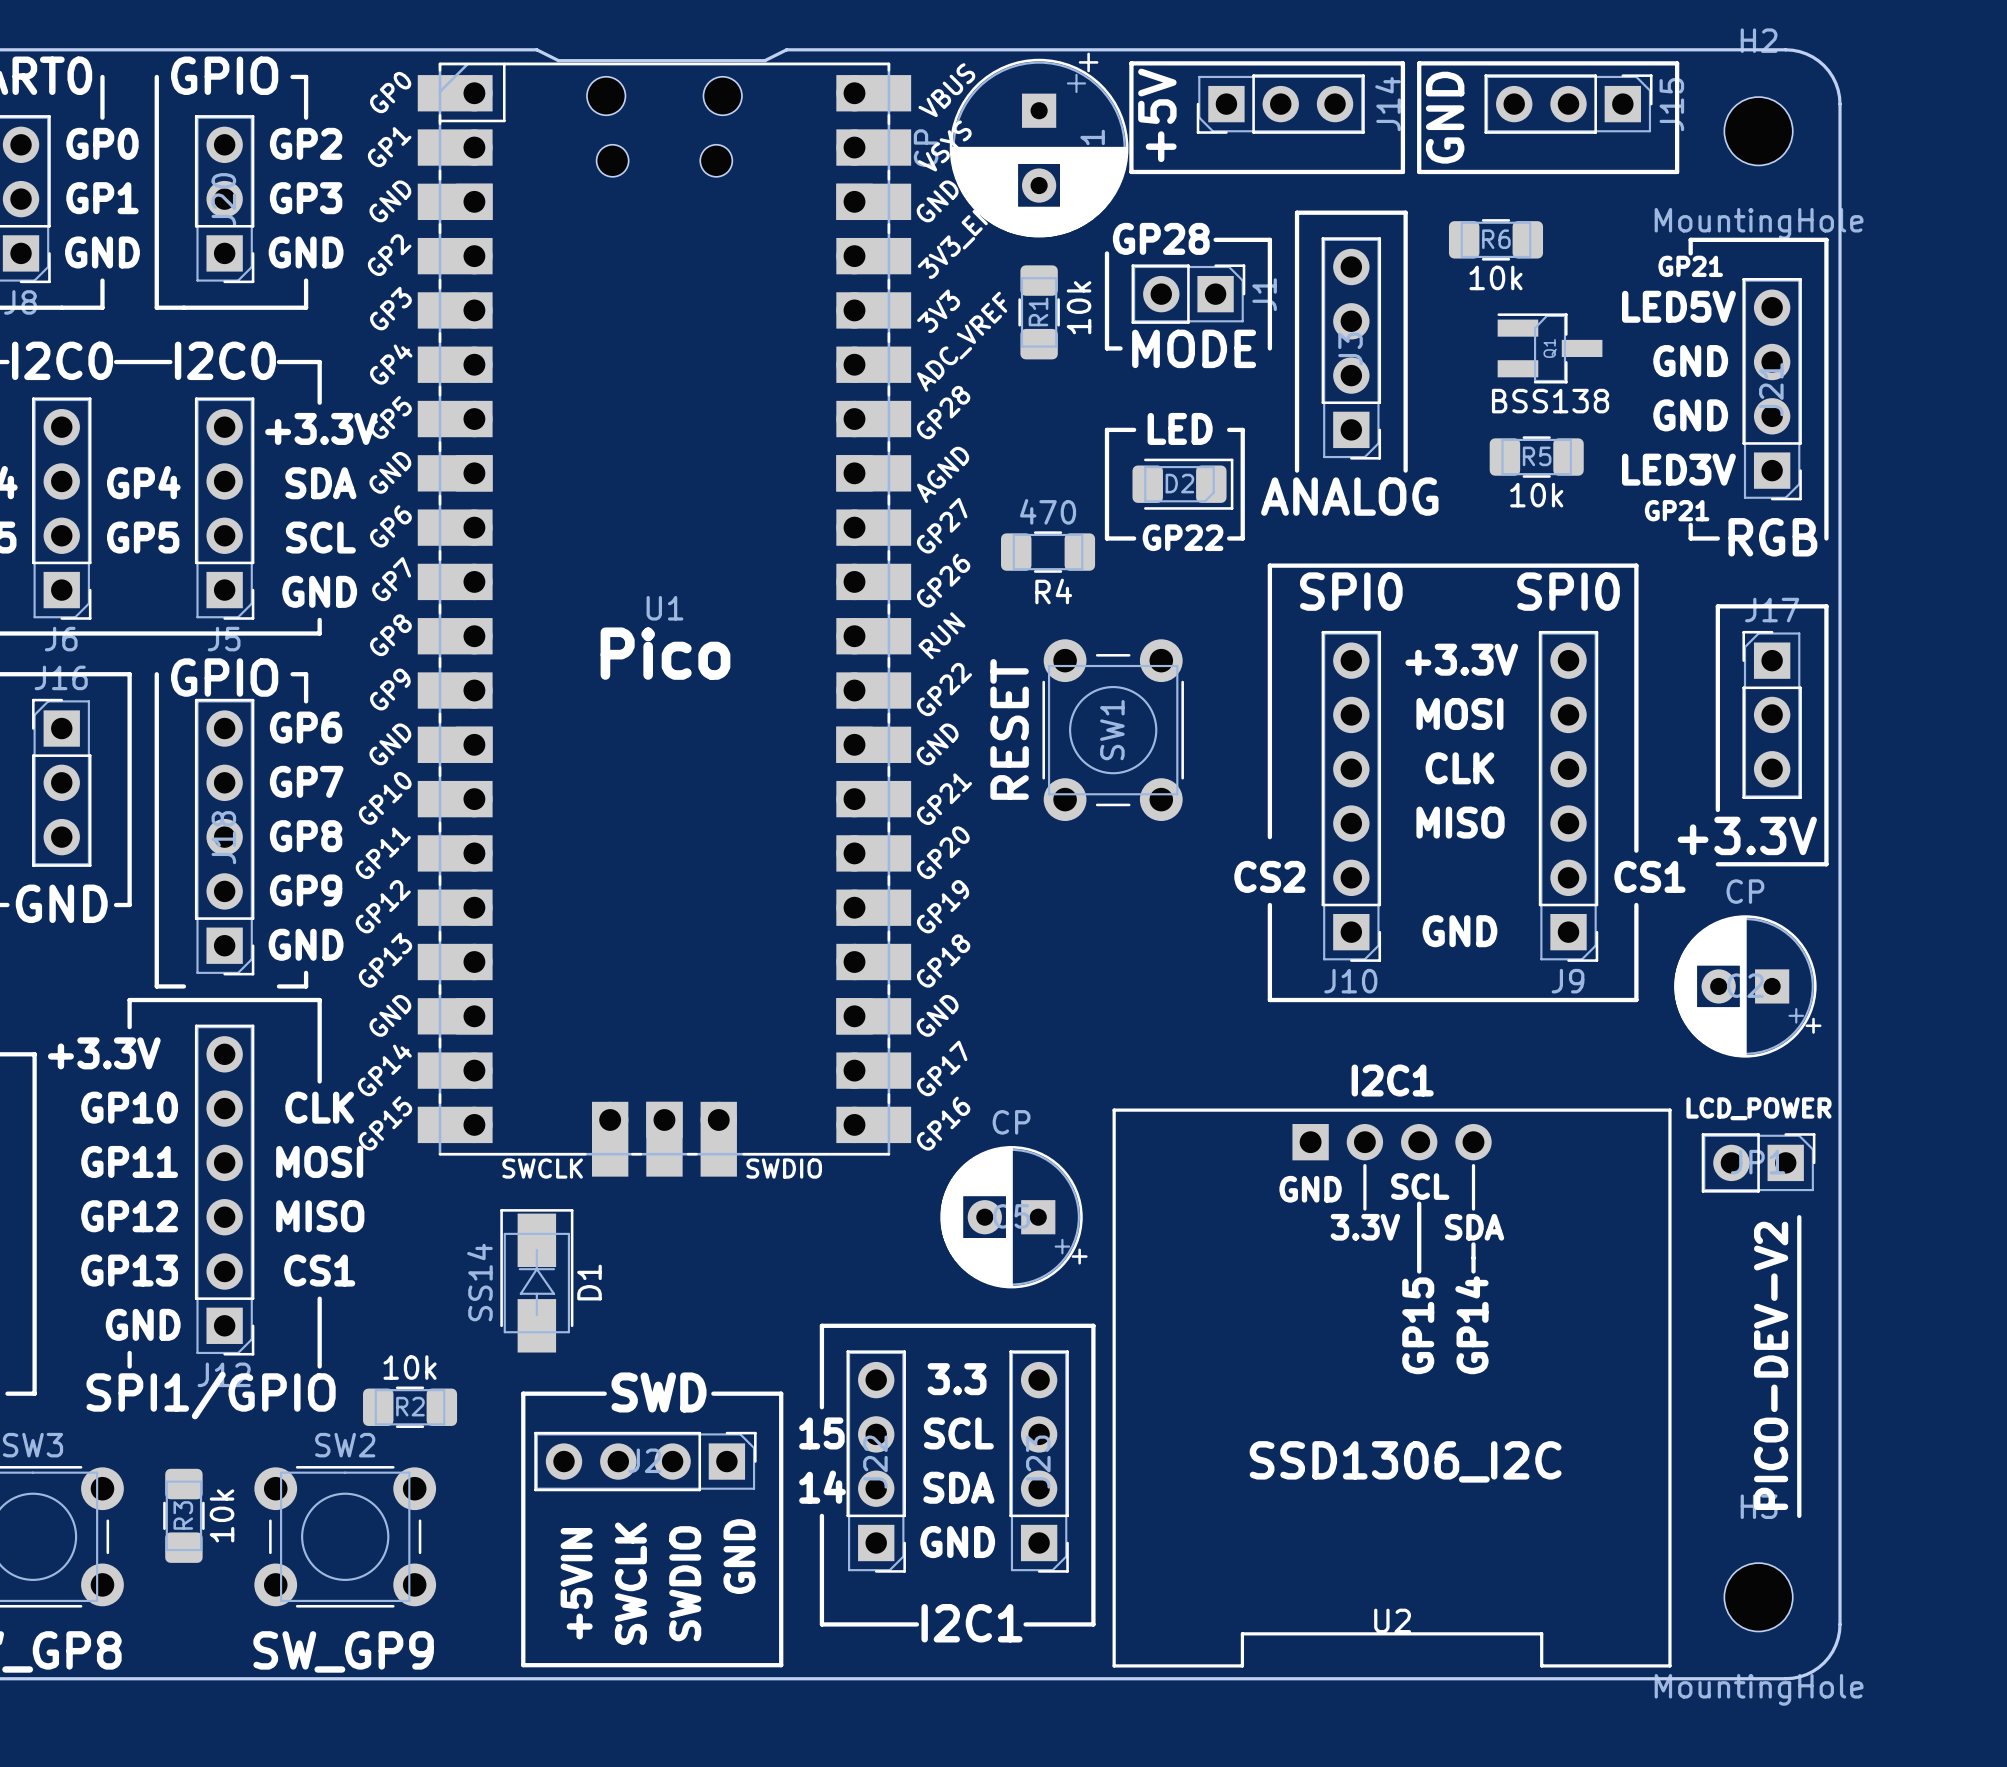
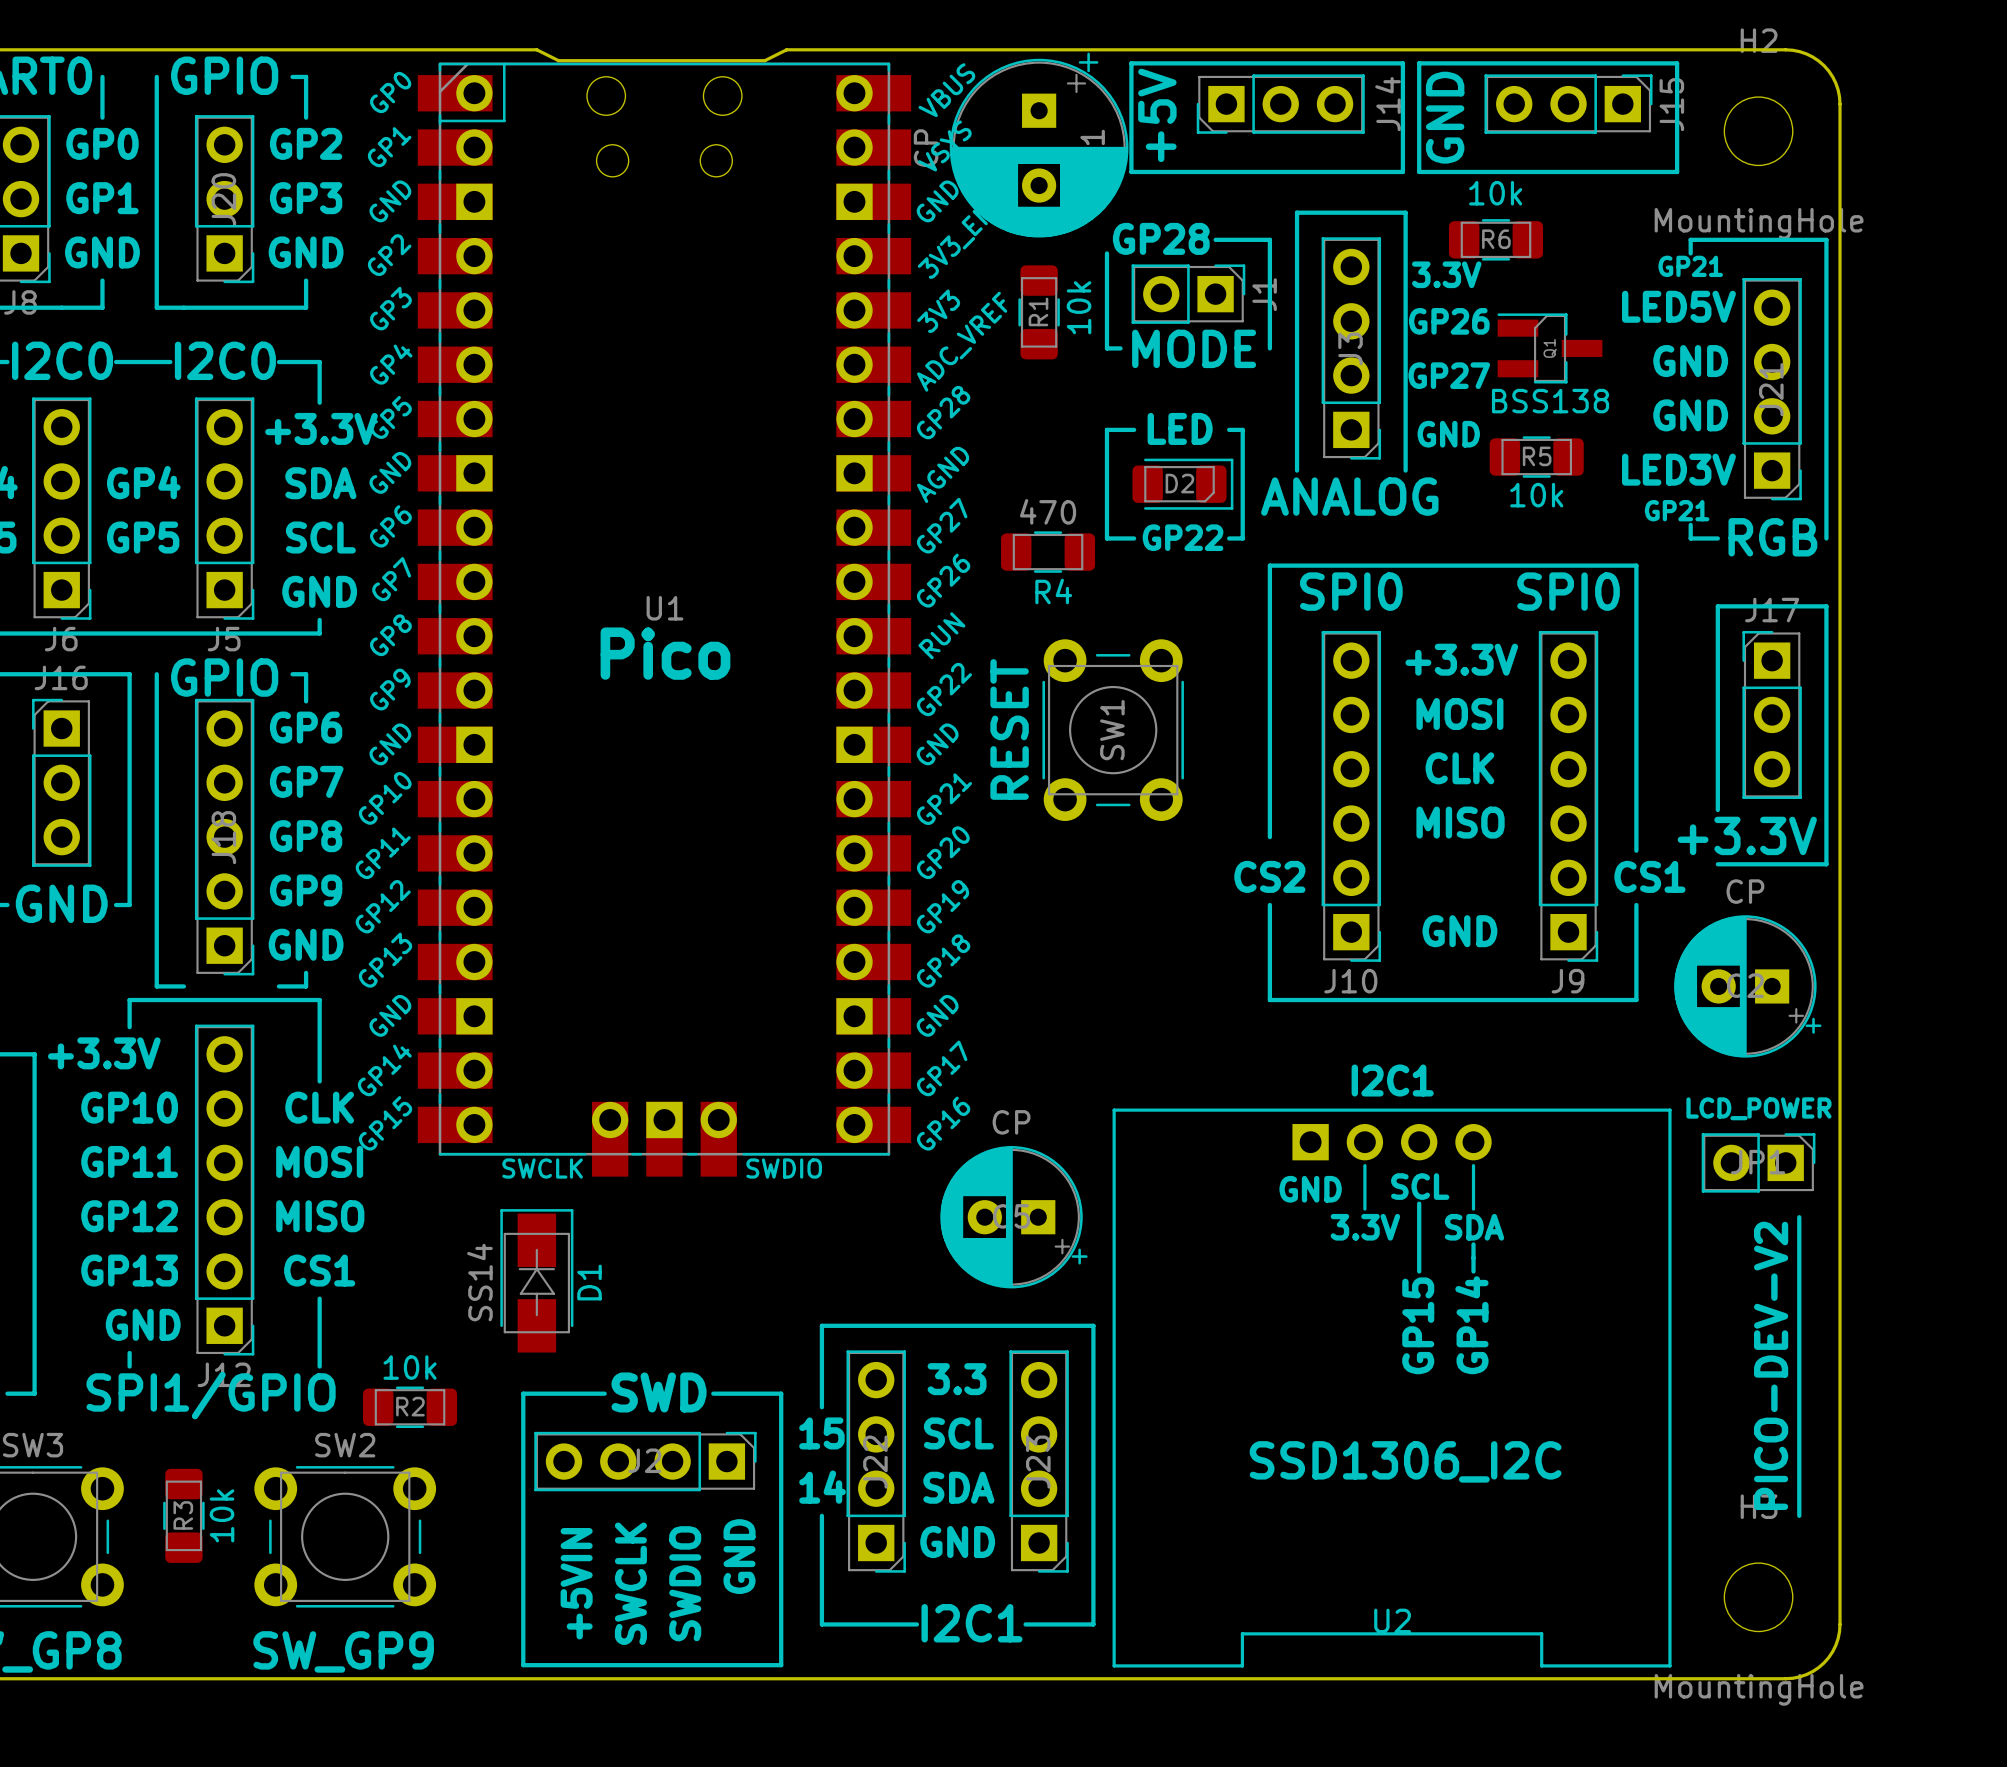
text: none -> 3.3V (1446, 274)
R6 value position: 10k (1496, 277) -> 10k (1495, 193)
text: none -> GP26 (1449, 321)
text: none -> GP27 (1449, 375)
text: none -> GND (1448, 434)

